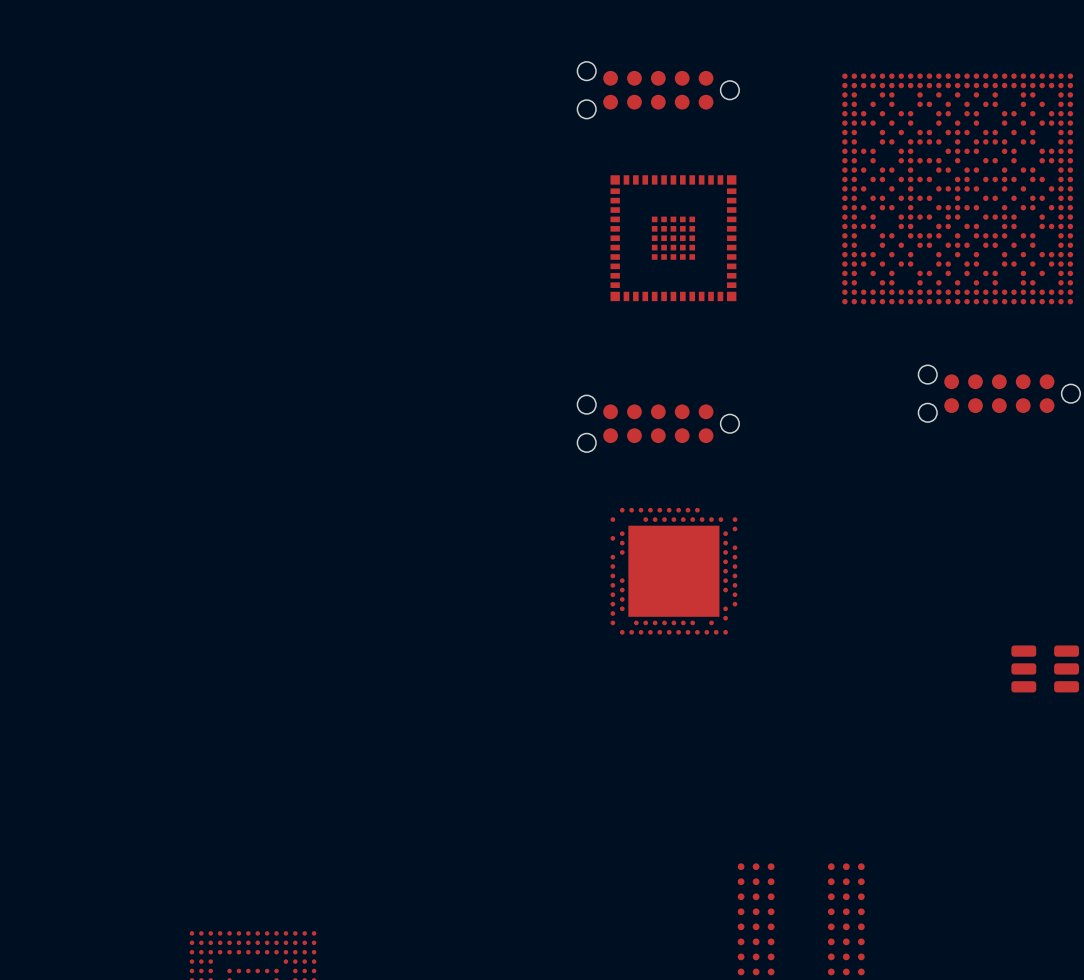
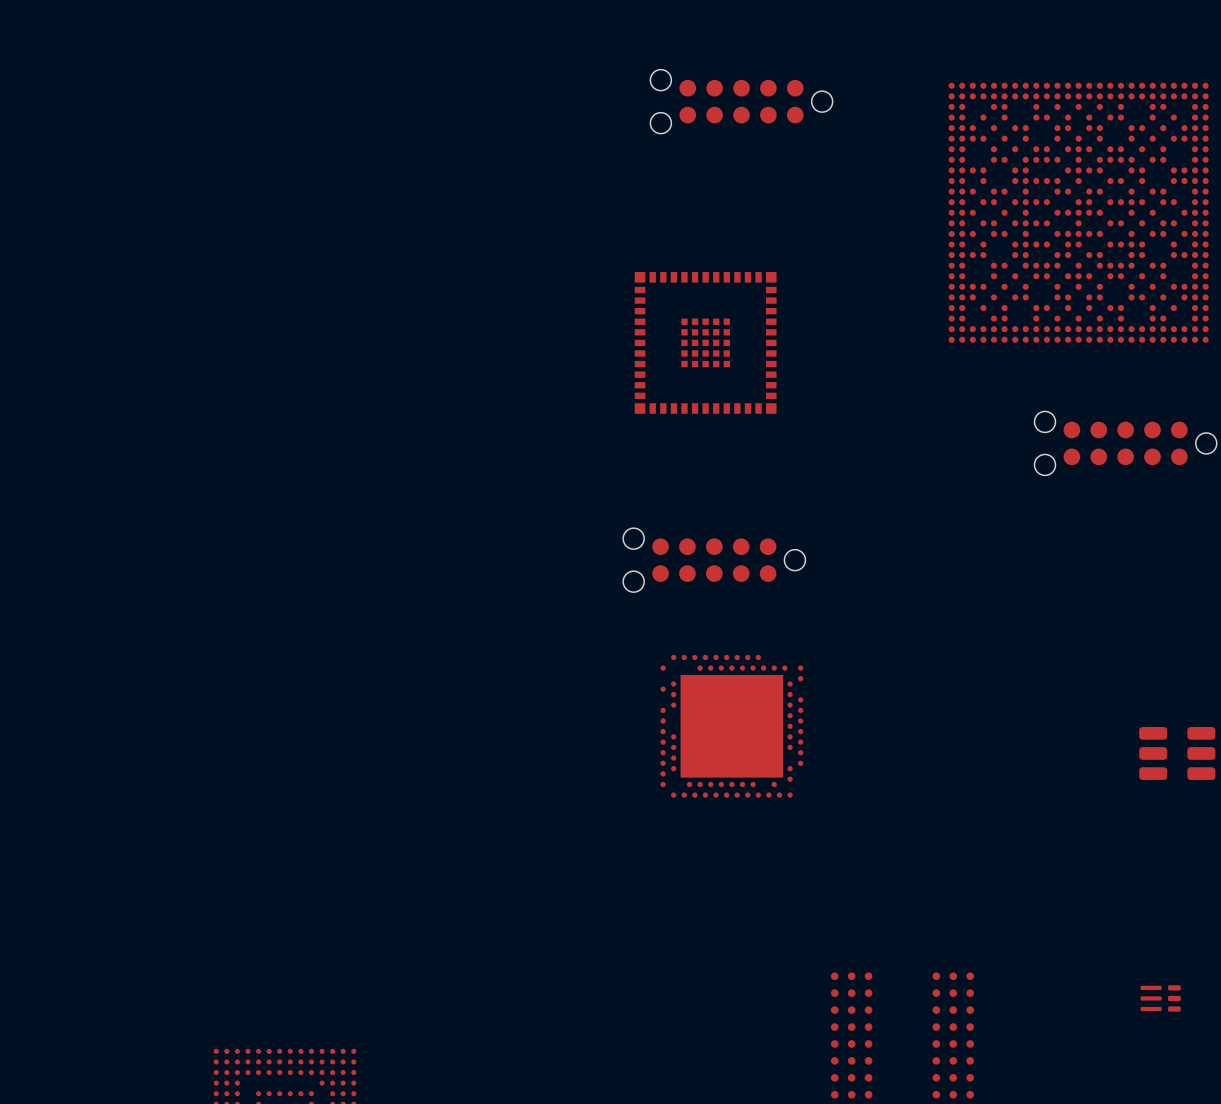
part position: (673, 238) -> (705, 342)
part position: (658, 423) -> (714, 560)
part position: (673, 571) -> (731, 726)
part: none -> (1160, 998)

